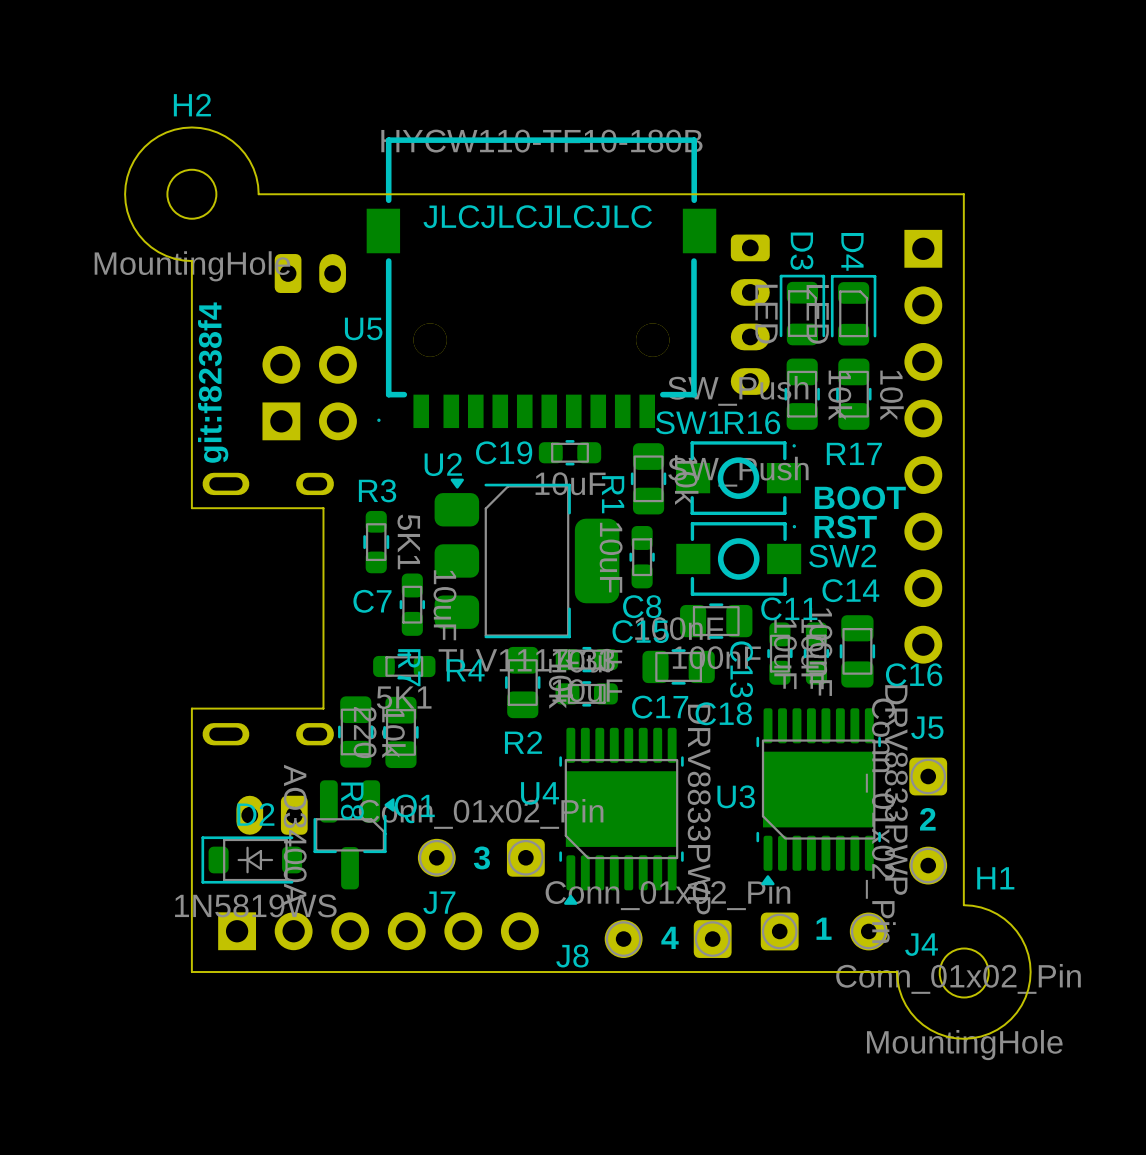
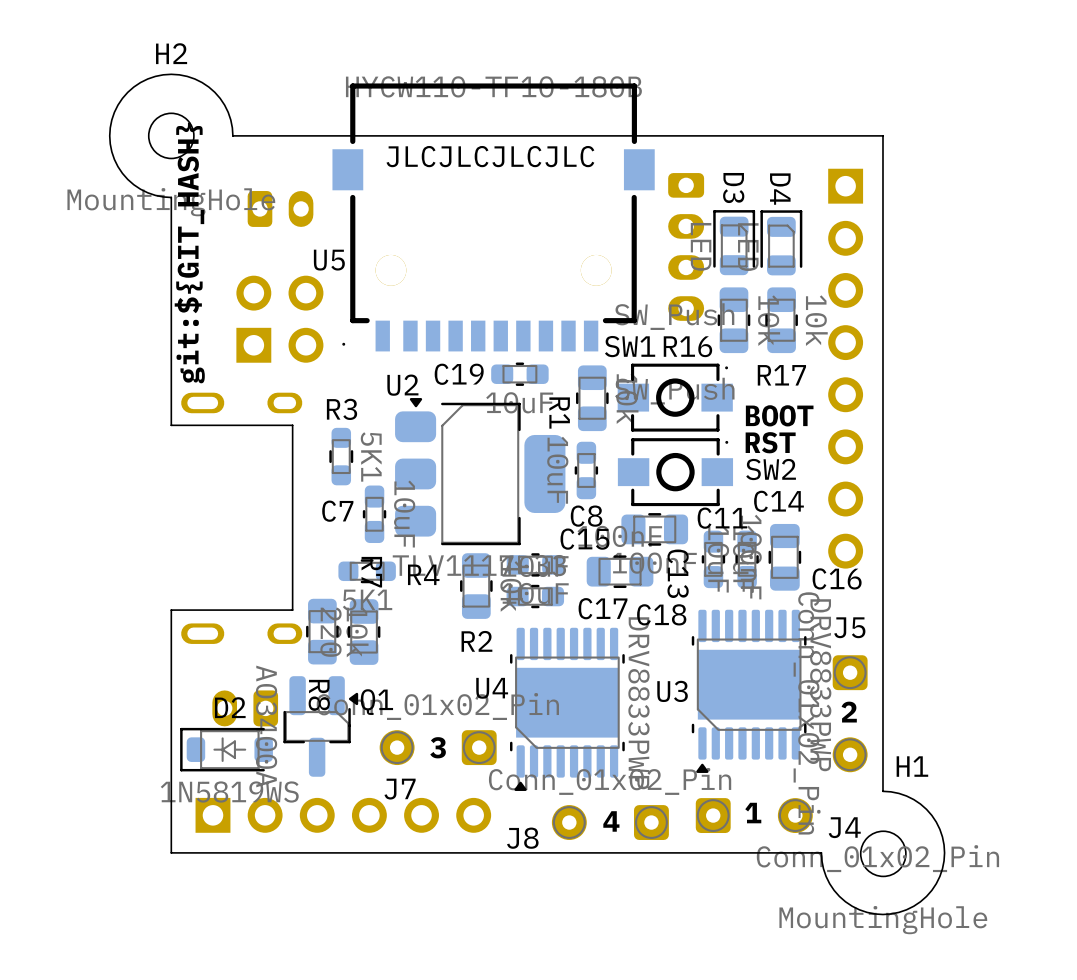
text: git:f8238f4 (213, 382) -> git:${GIT_HASH} (189, 253)

